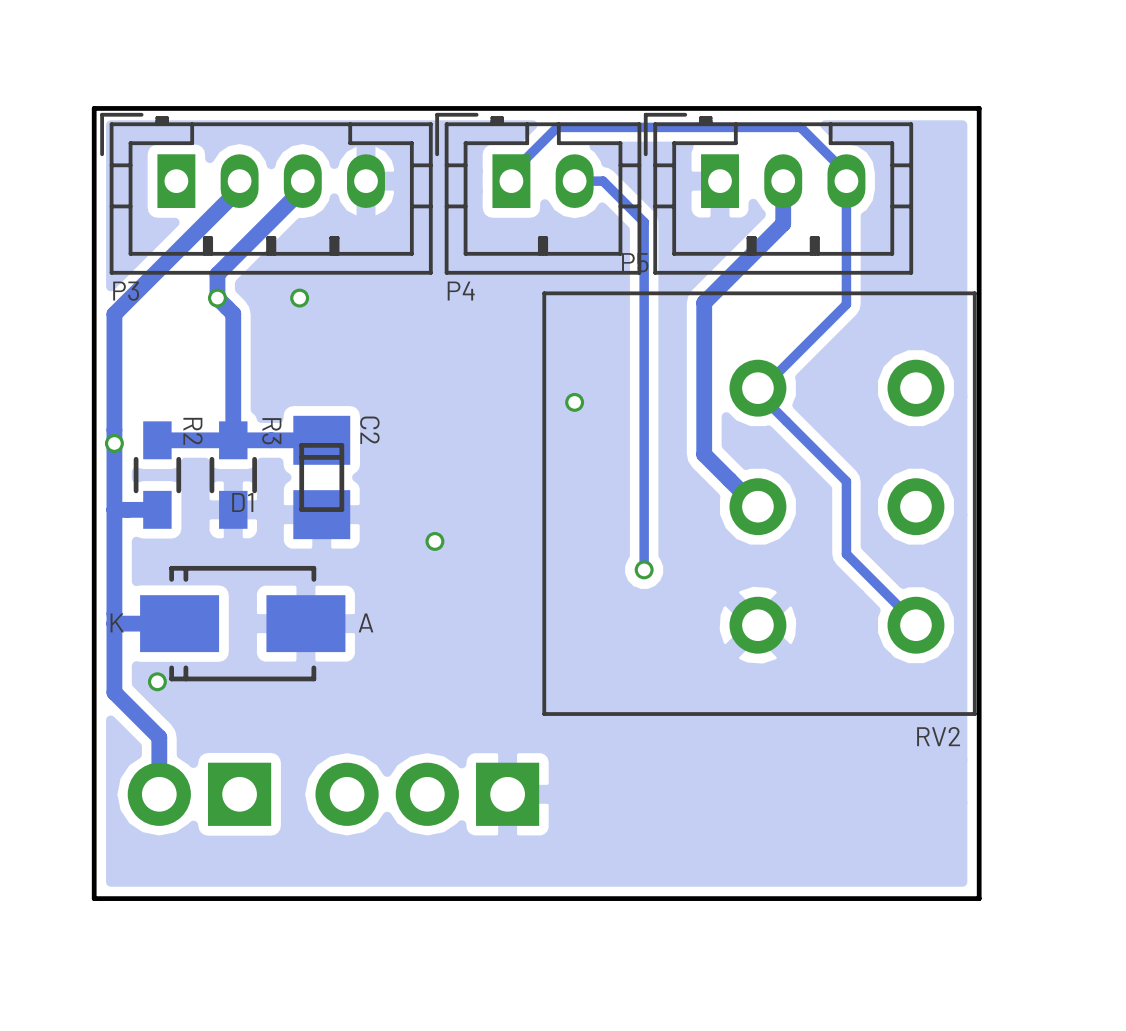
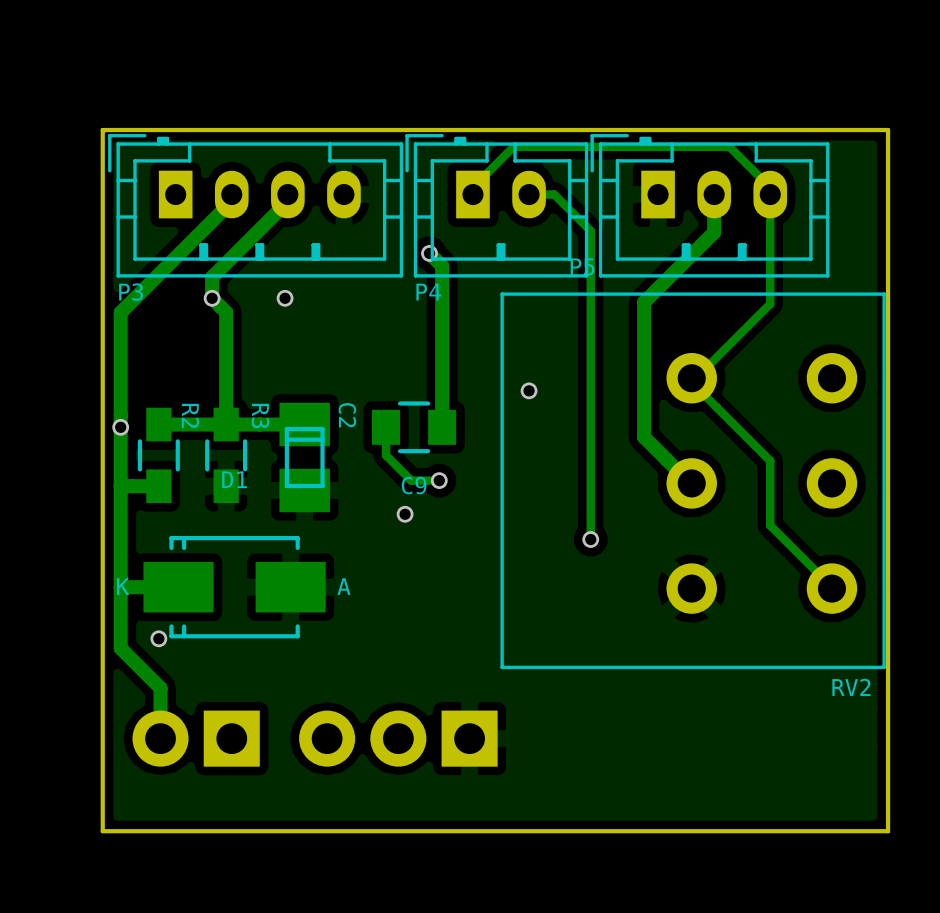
track: none -> (429, 253) (442, 266) (442, 427)
via: none -> (429, 253)
track: none -> (386, 427) (386, 455) (411, 480) (439, 480)
C9: none -> (414, 427)
via: none -> (439, 480)

